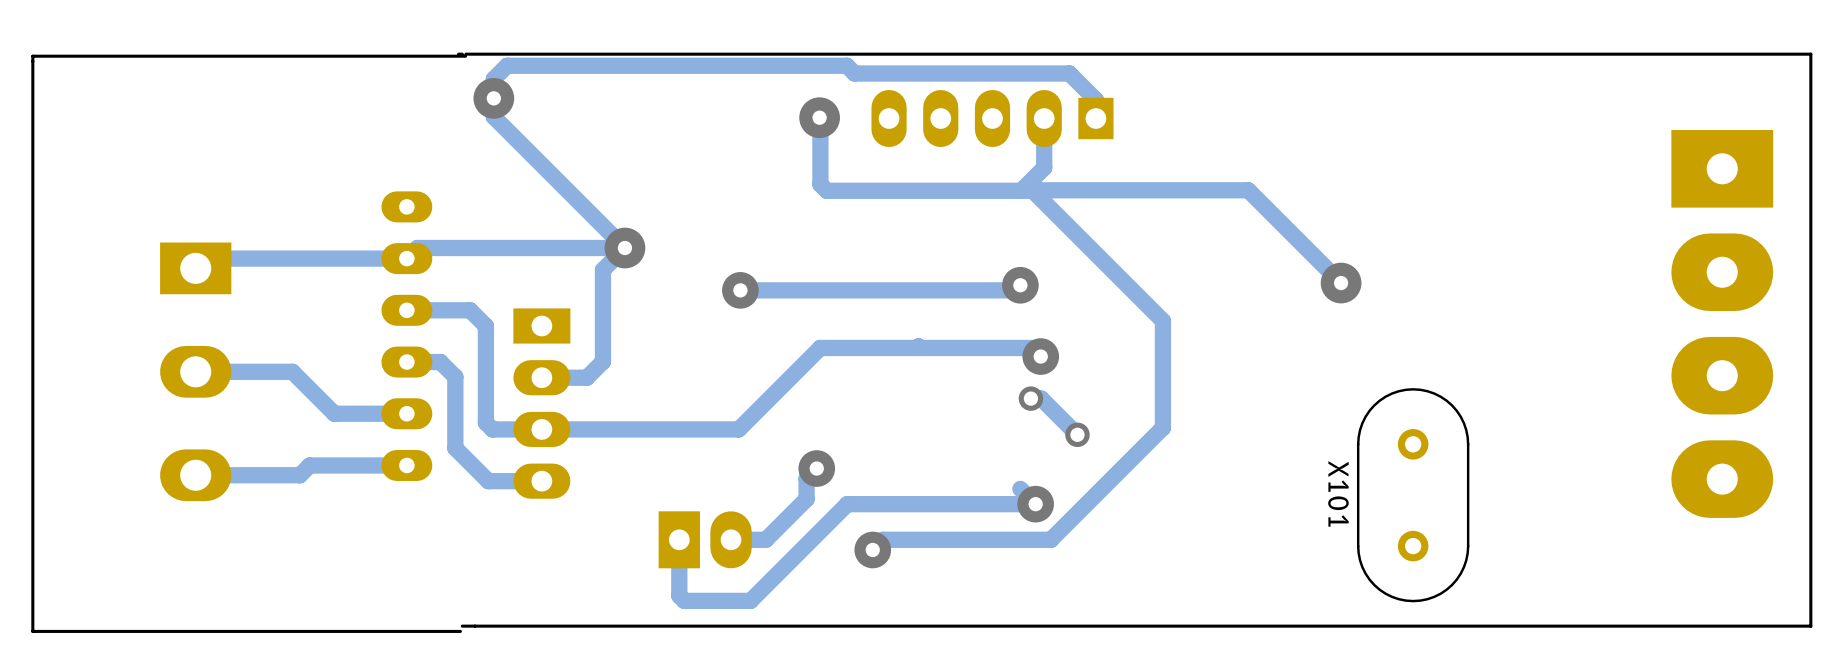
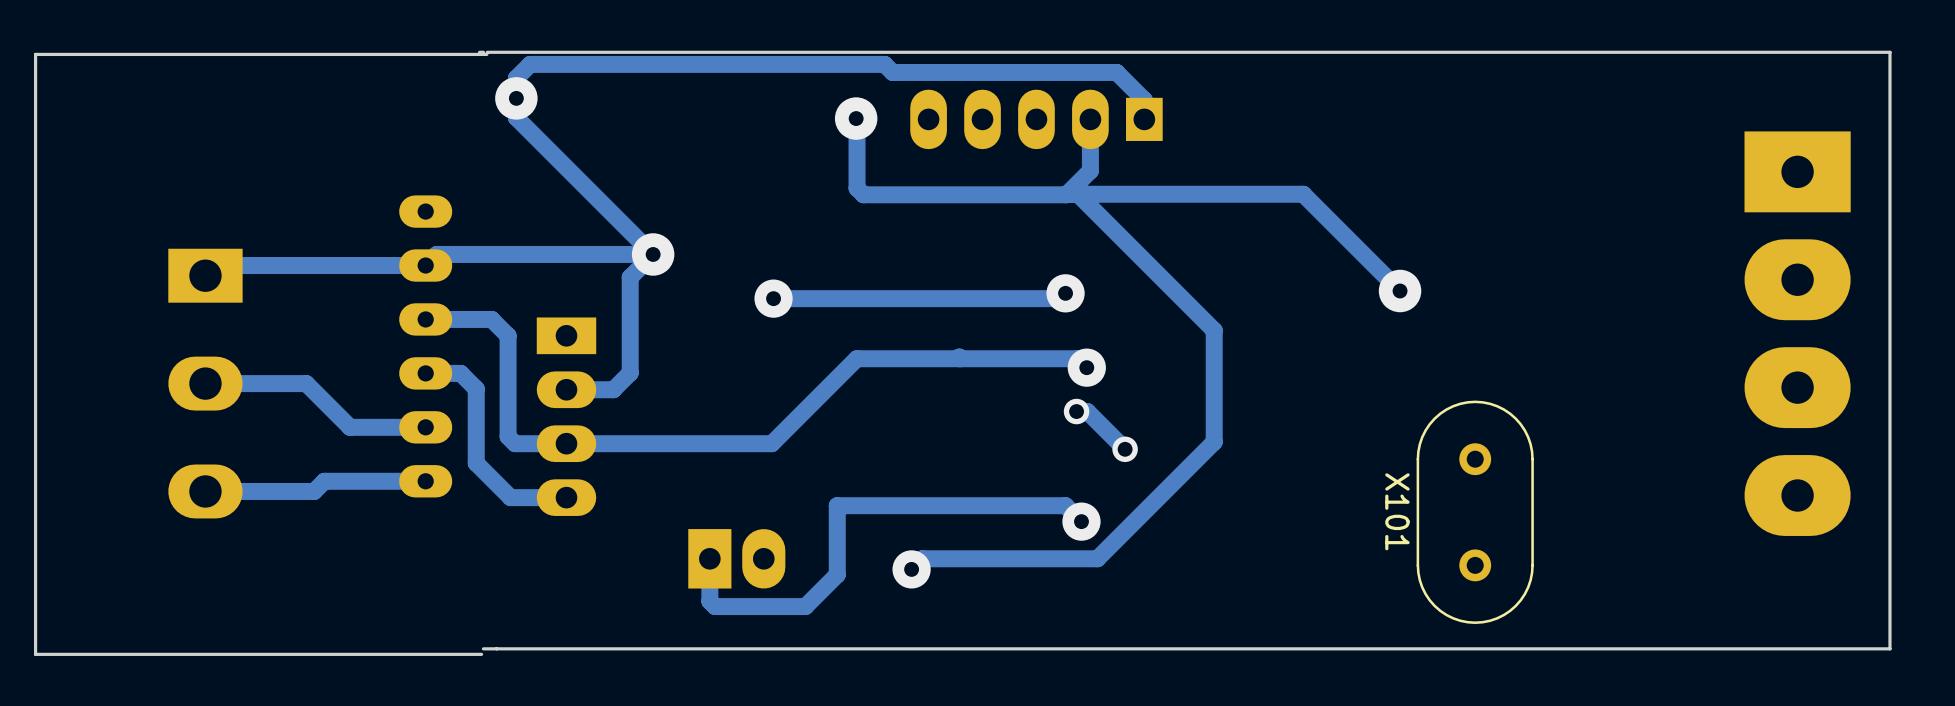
track: (816, 468) (806, 478) (806, 499) (765, 539) (731, 539) -> none
via: (816, 468) -> none
track: (1035, 504) (847, 504) (750, 600) (684, 600) (679, 595) (679, 580) -> (1065, 505) (837, 505) (837, 574) (805, 606) (715, 606) (709, 601)

